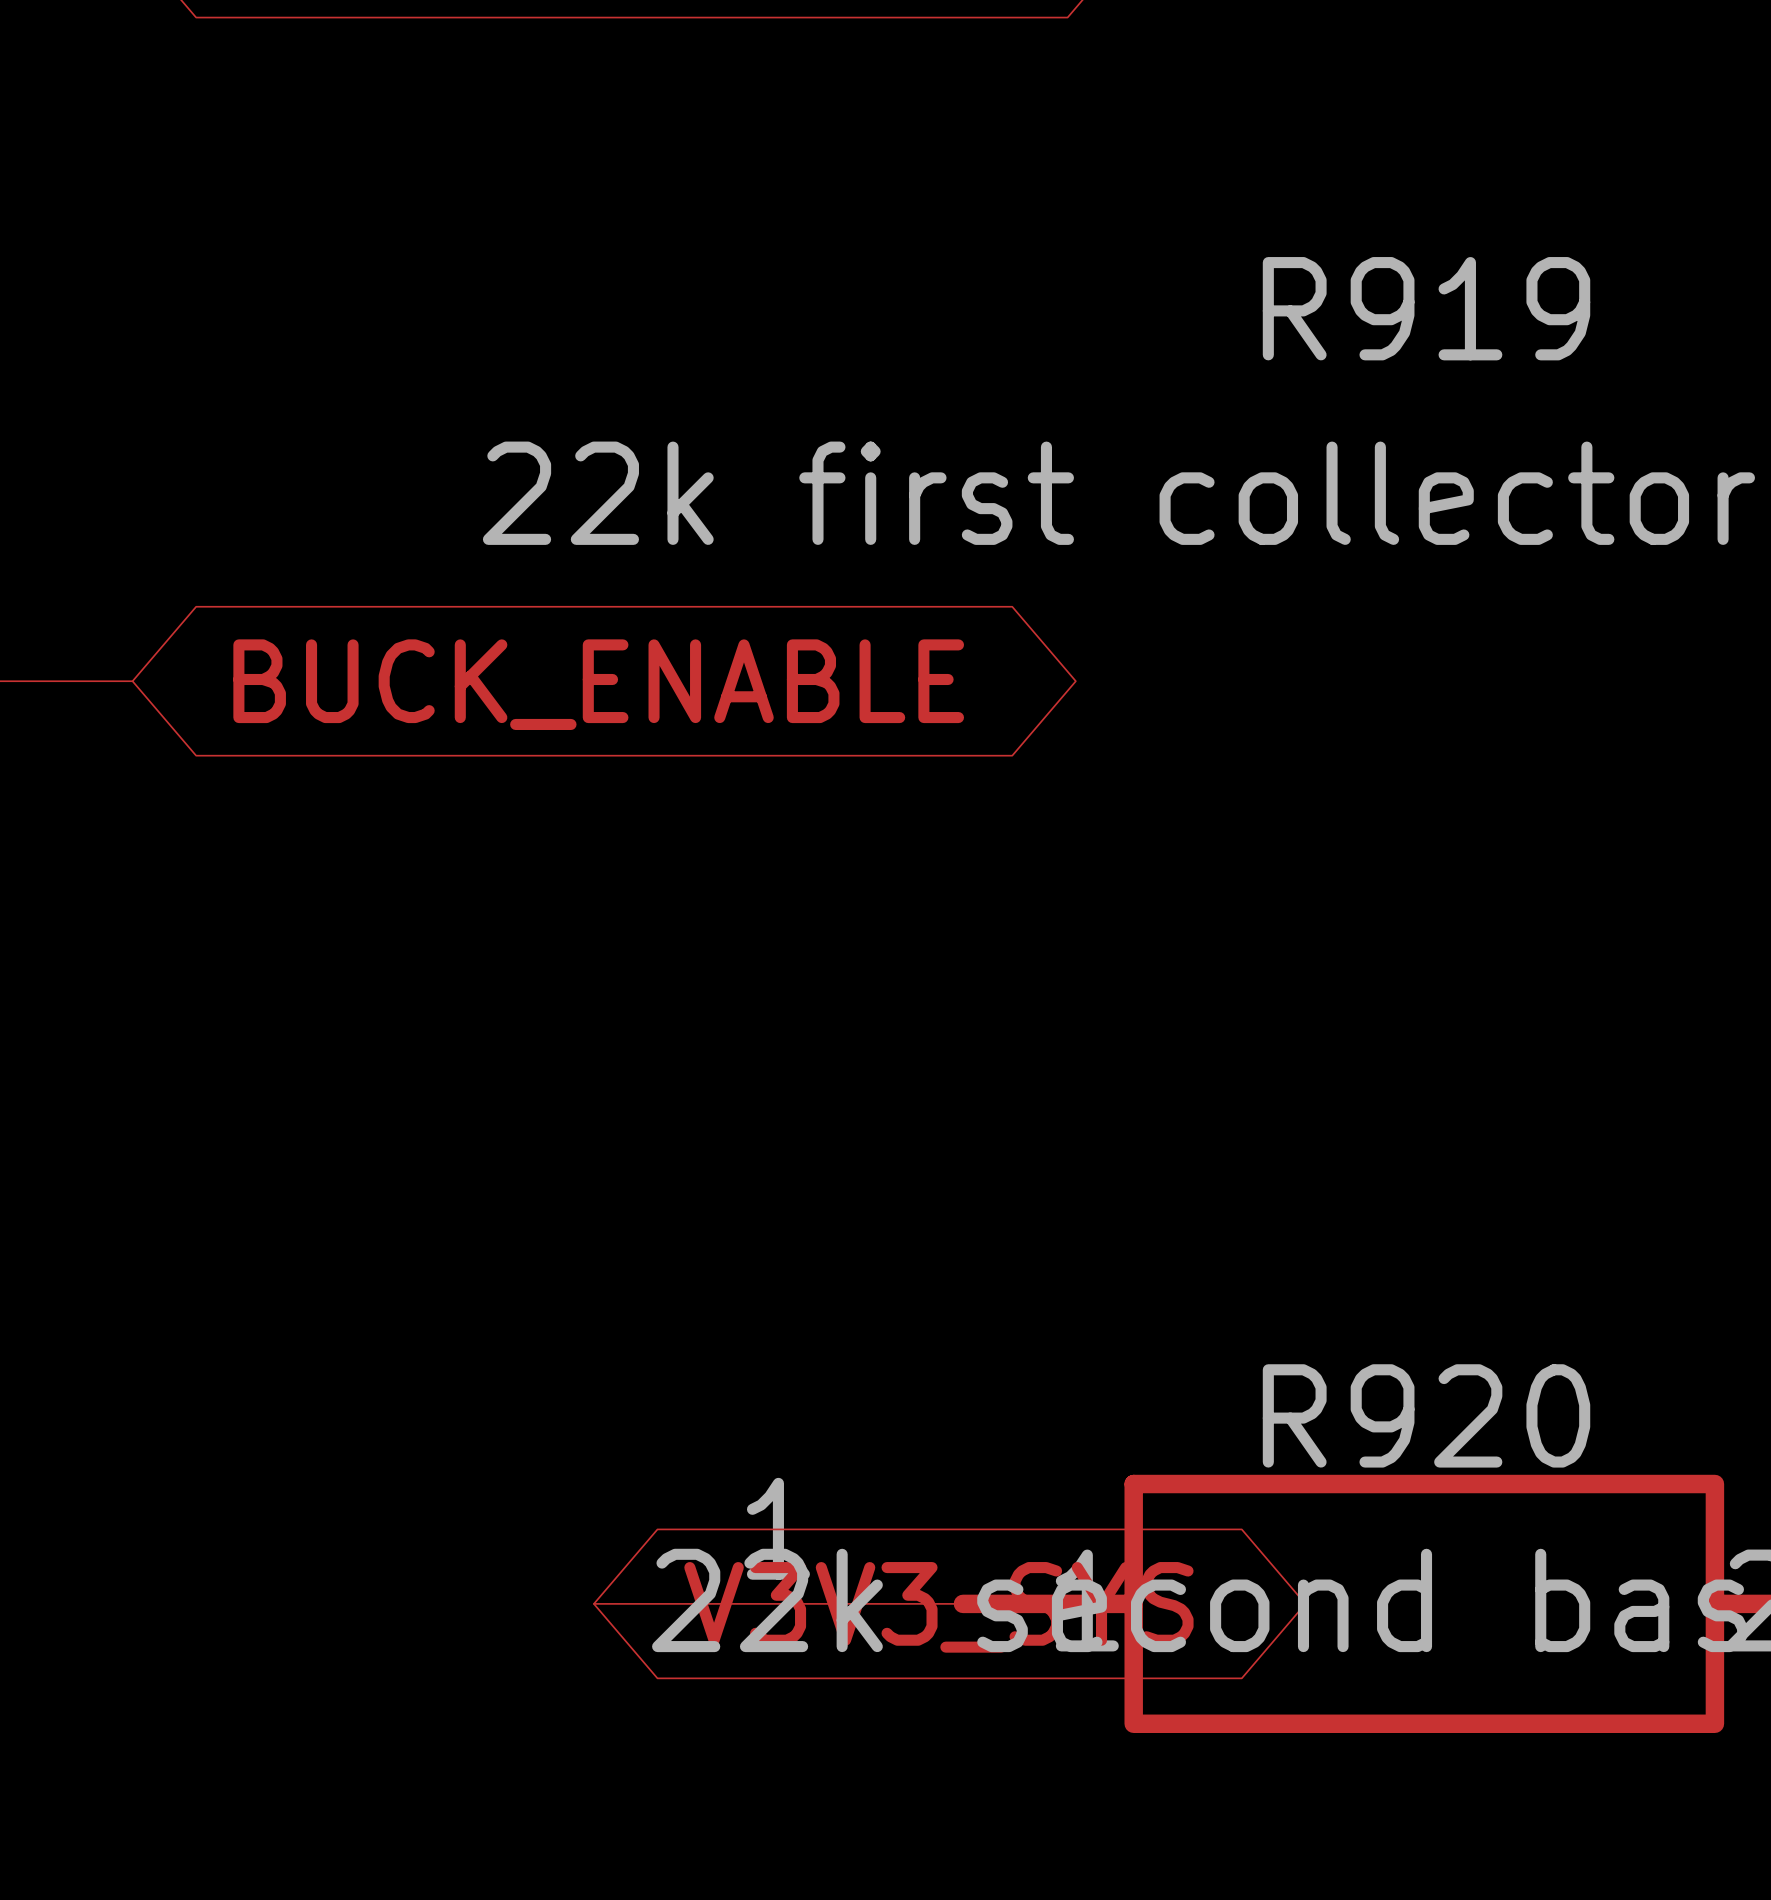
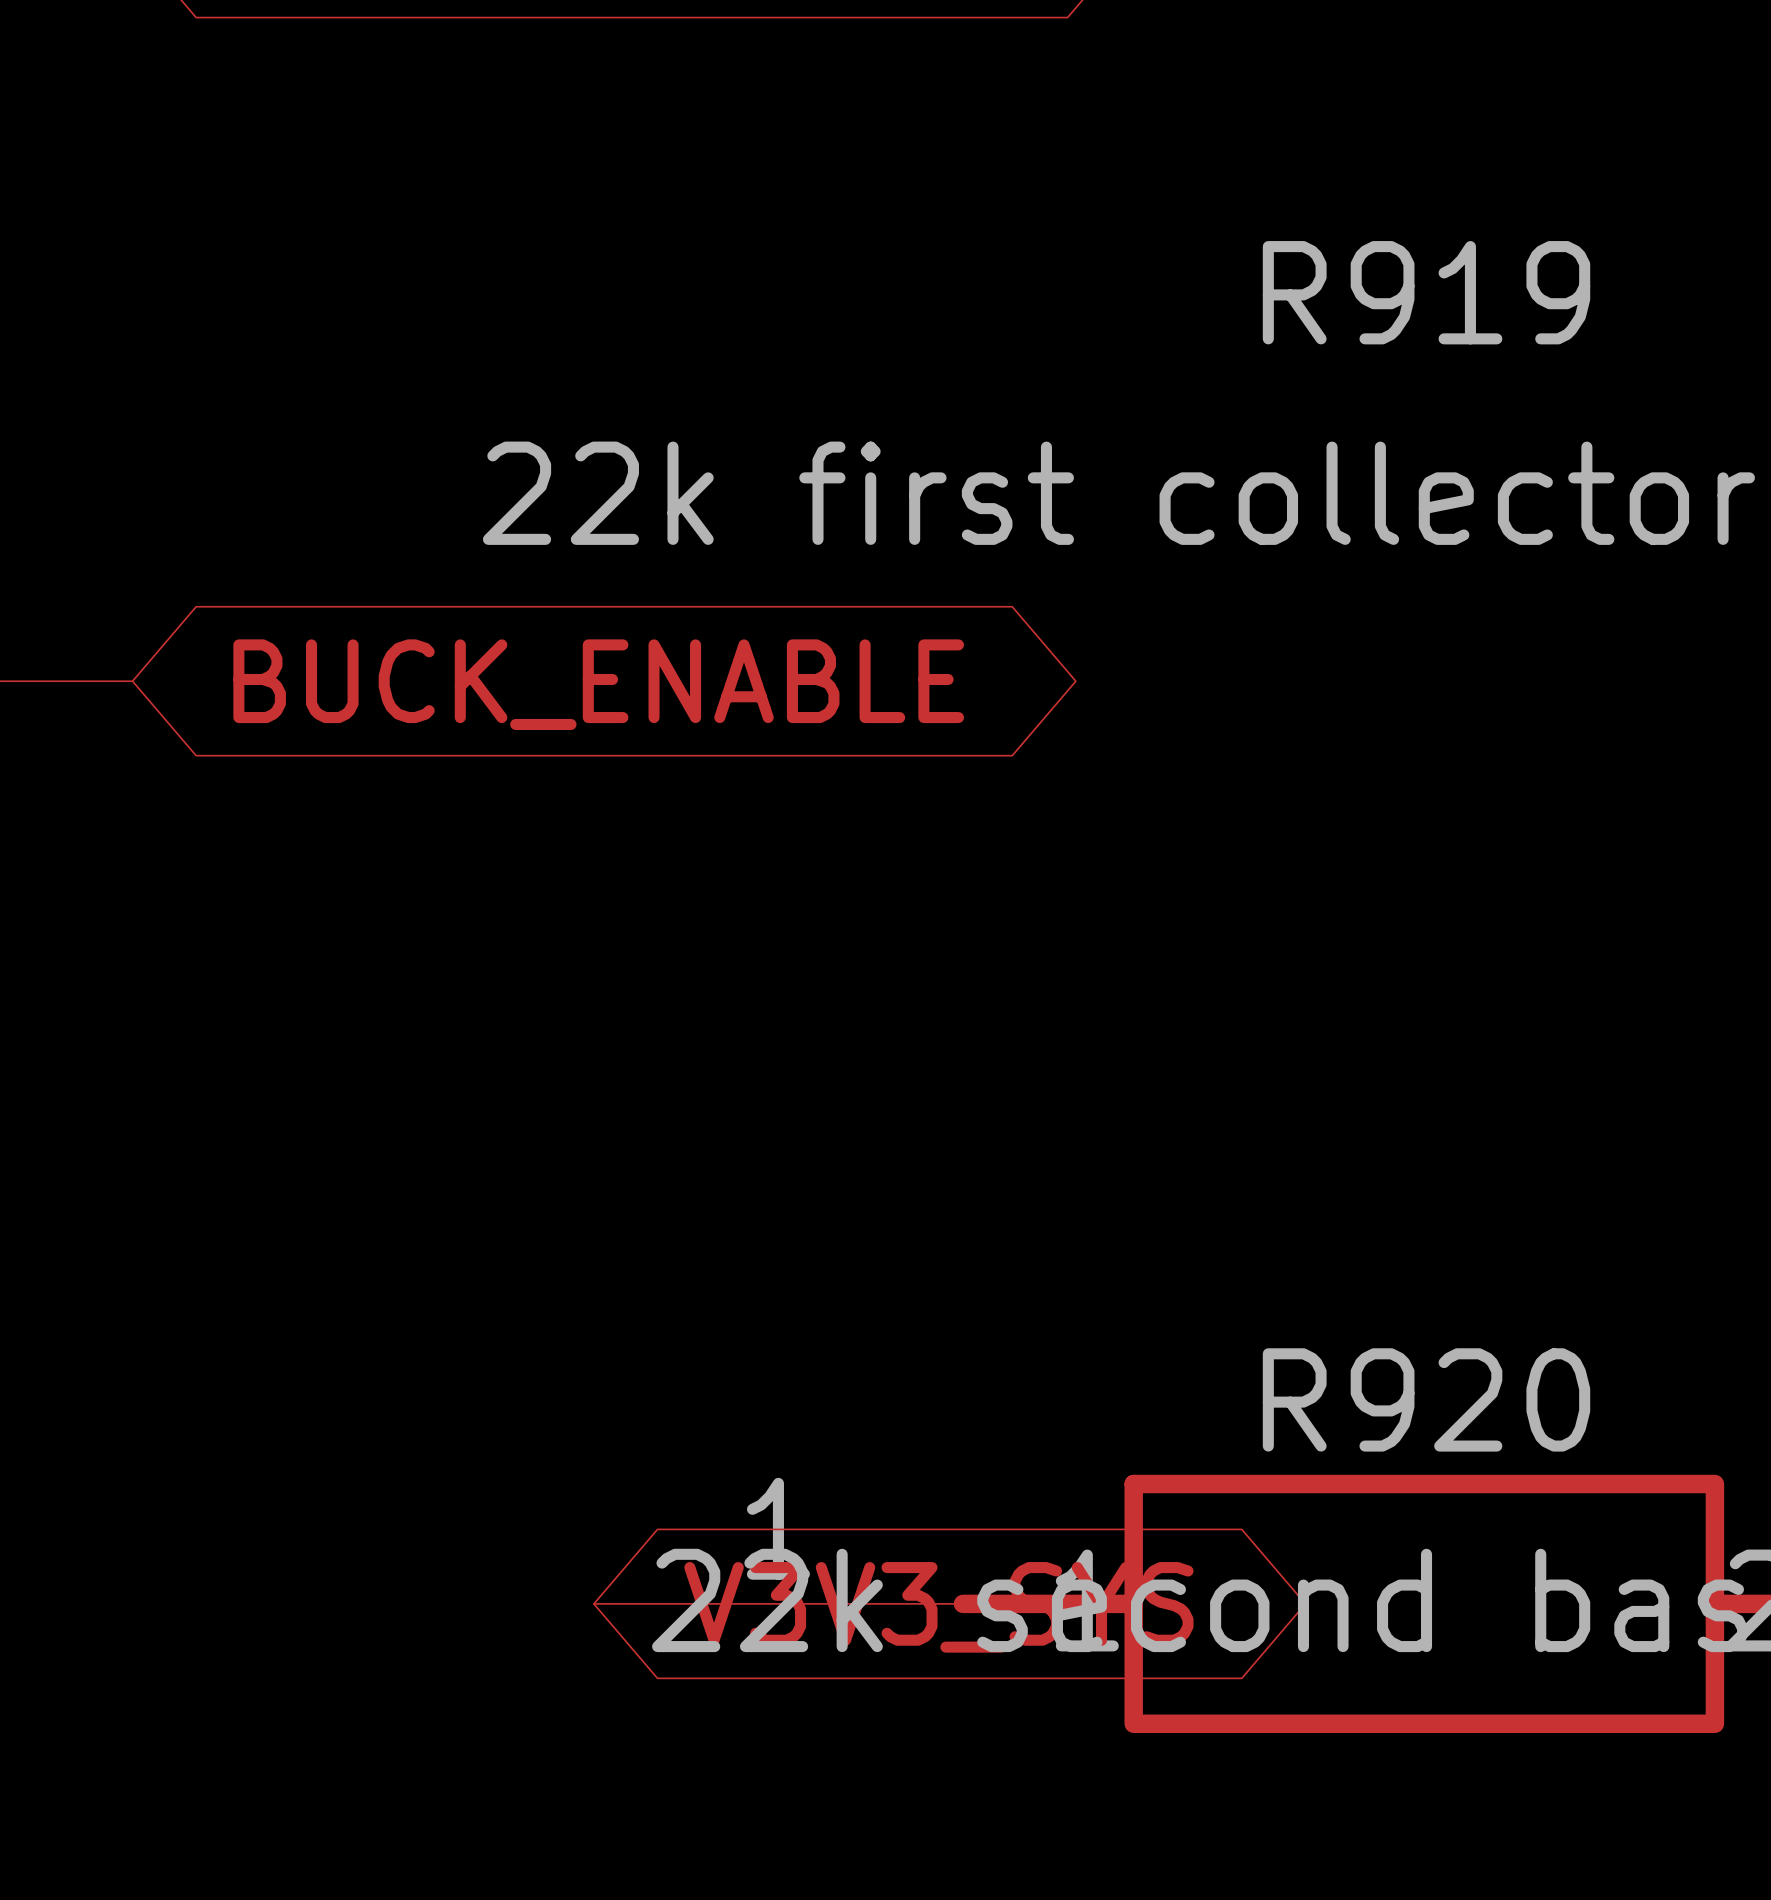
R919 name position: R919 (1426, 308) -> R919 (1426, 292)
R920 name position: R920 (1426, 1415) -> R920 (1426, 1399)

